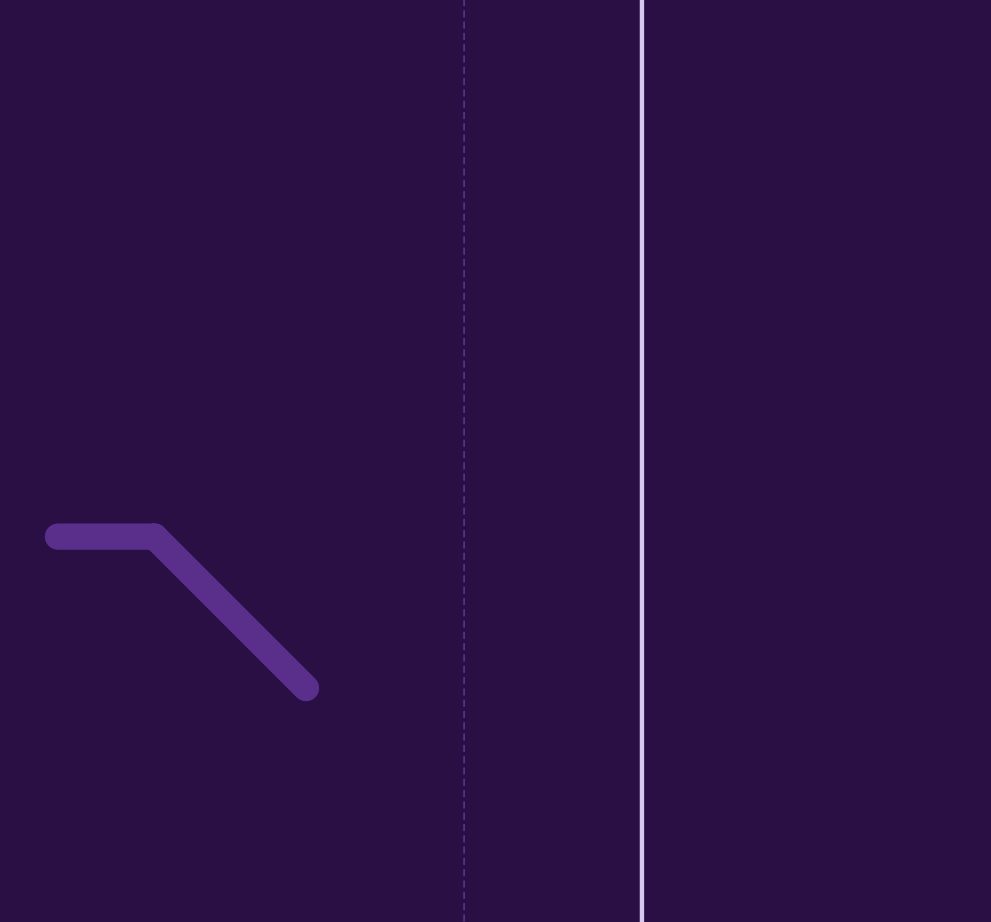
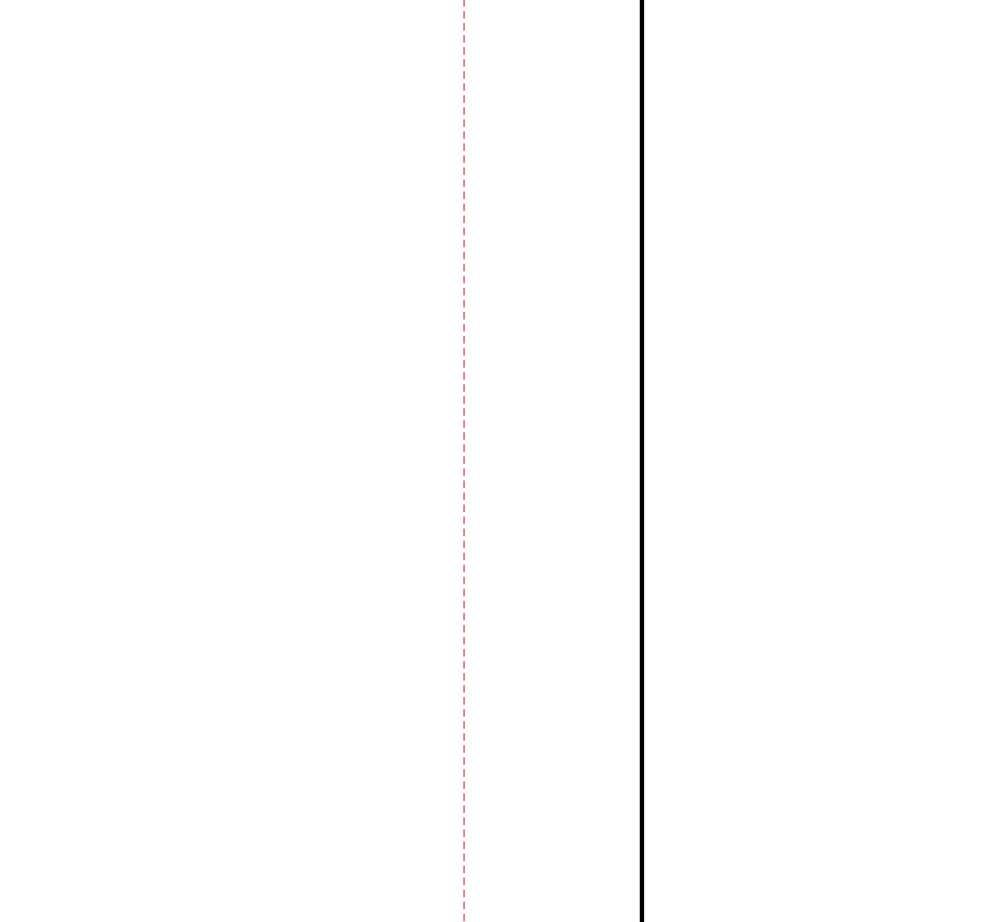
track: (57, 536) (154, 536) (306, 688) -> none

